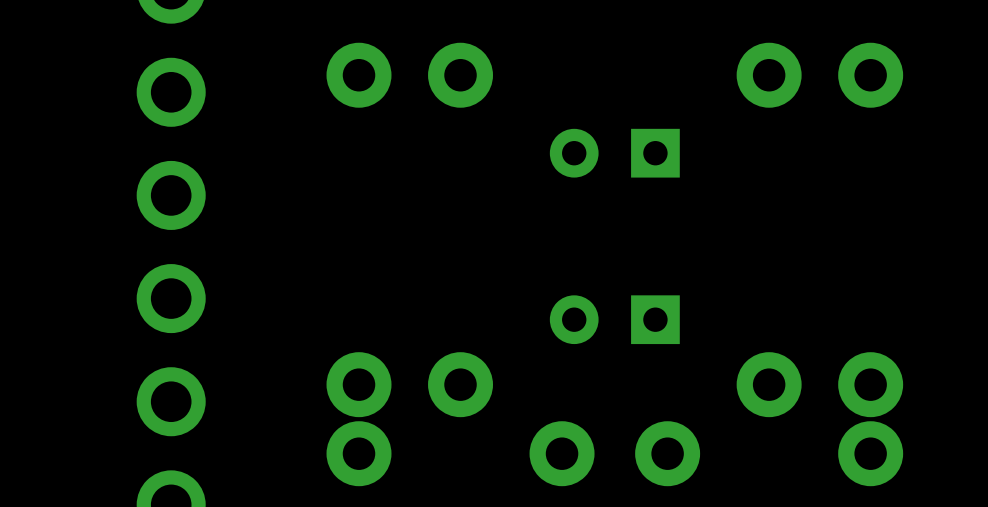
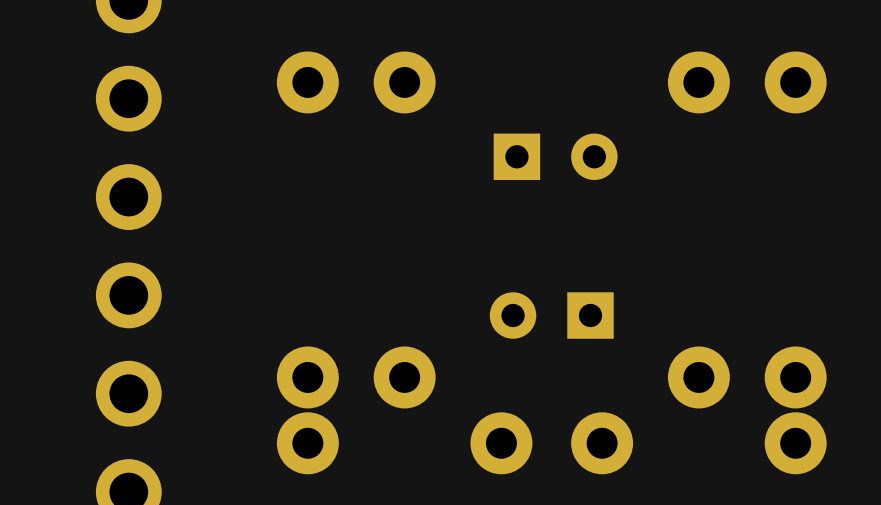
part rotation: 0° (614, 153) -> 180° (555, 156)

